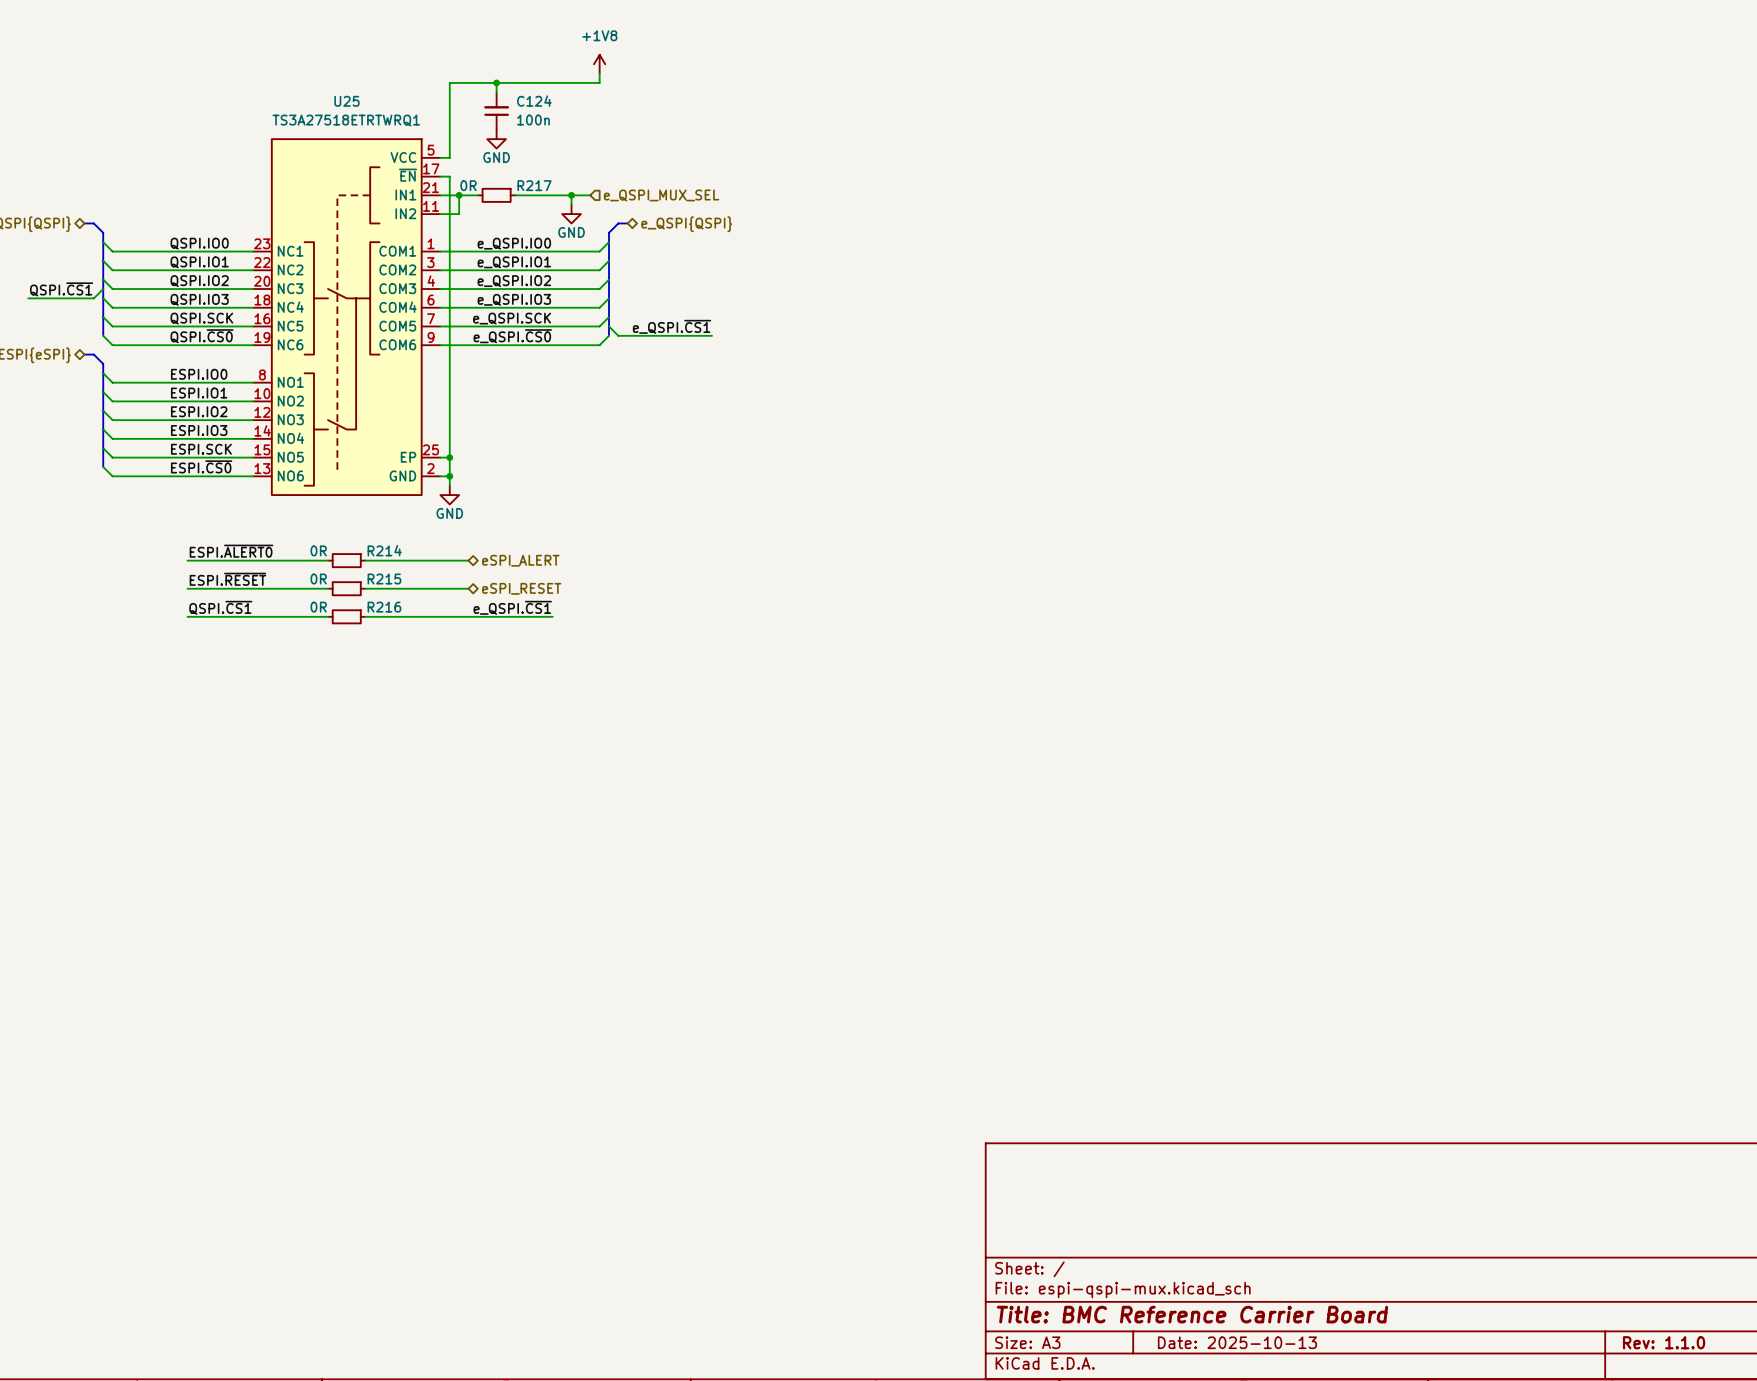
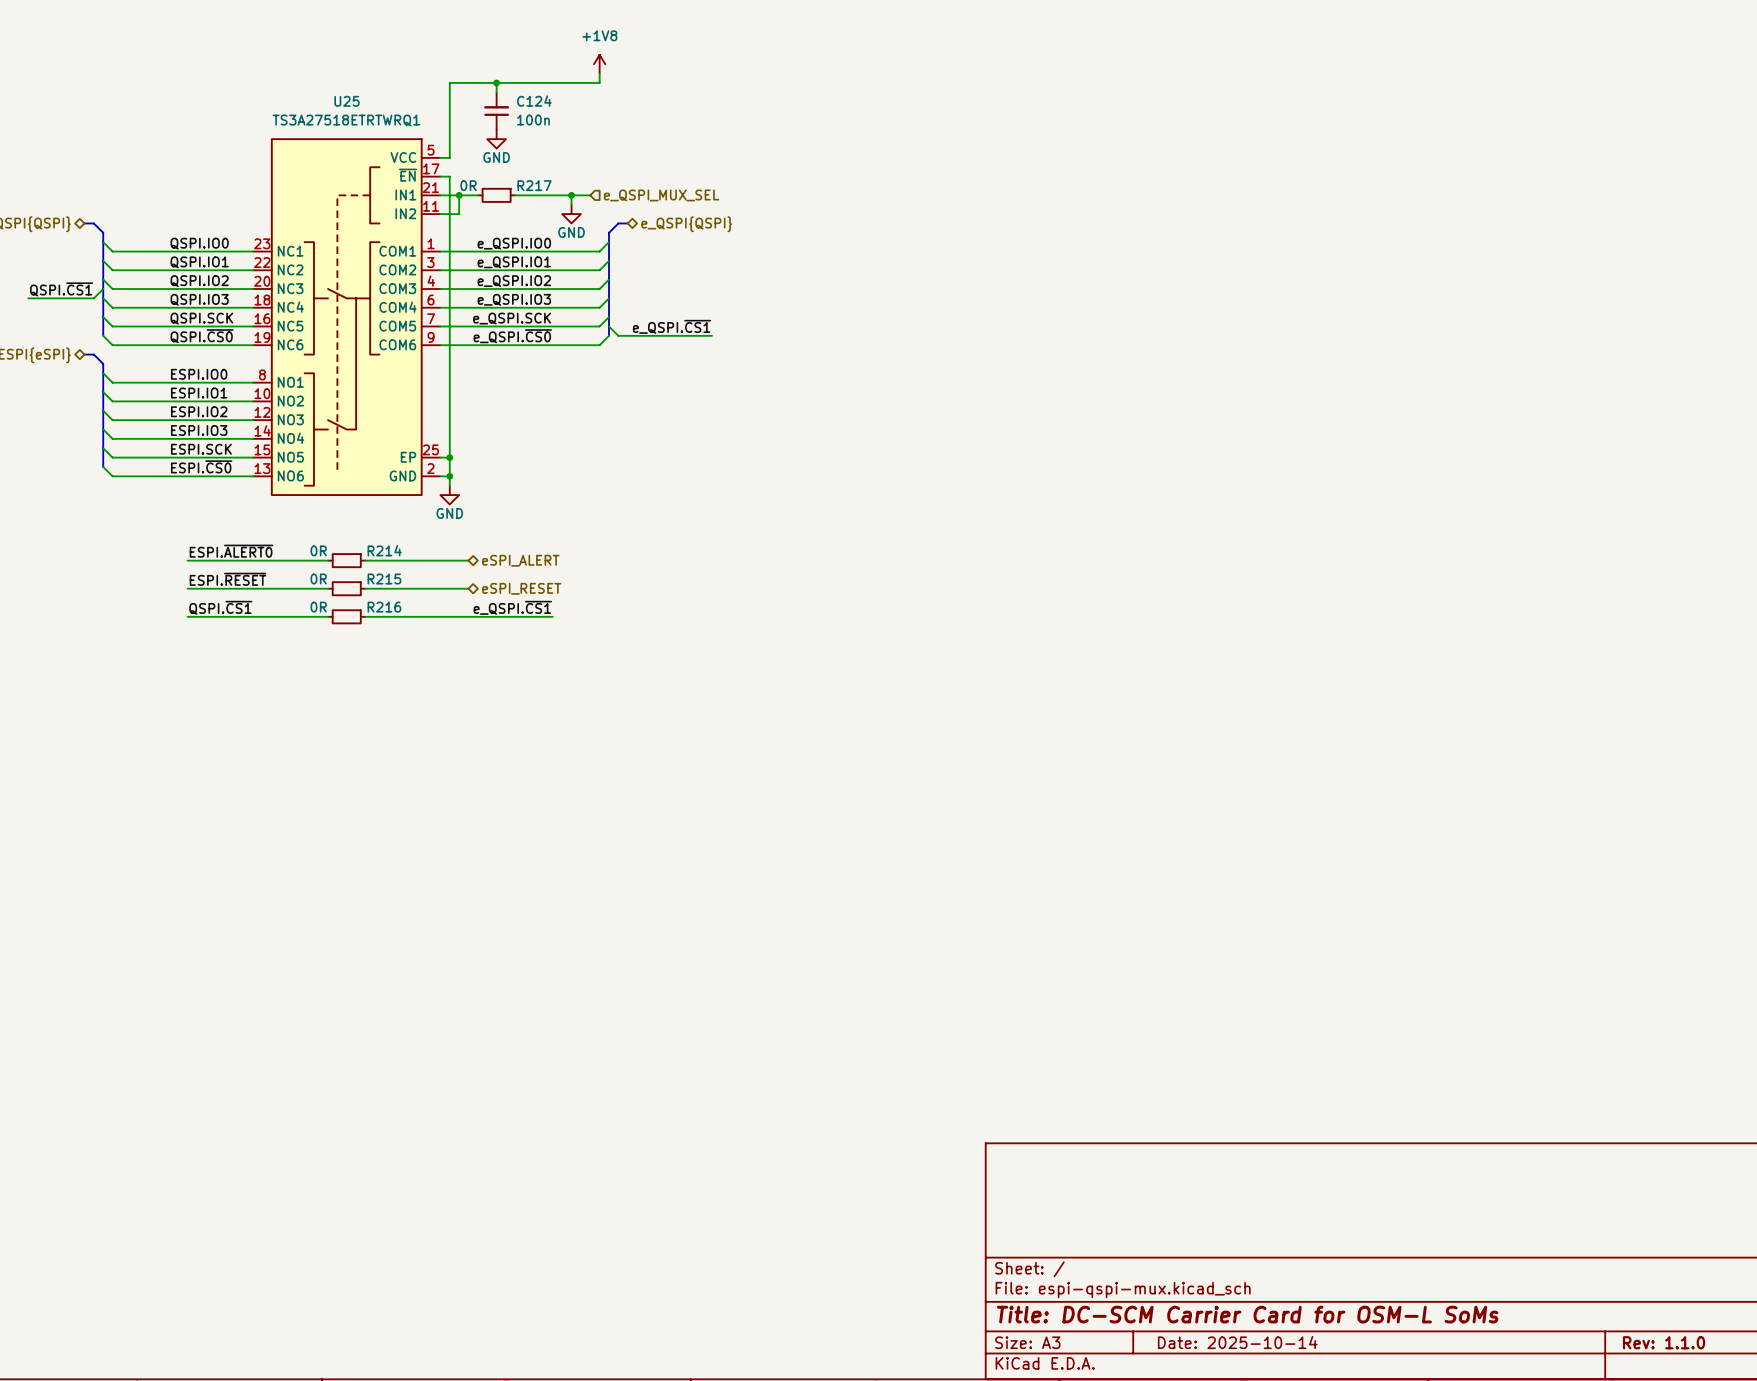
title block: Title: BMC Reference Carrier Board (1192, 1314) -> Title: DC-SCM Carrier Card for OSM-L SoMs (1247, 1314)
title block: Date: 2025-10-13 (1237, 1342) -> Date: 2025-10-14 (1237, 1342)

